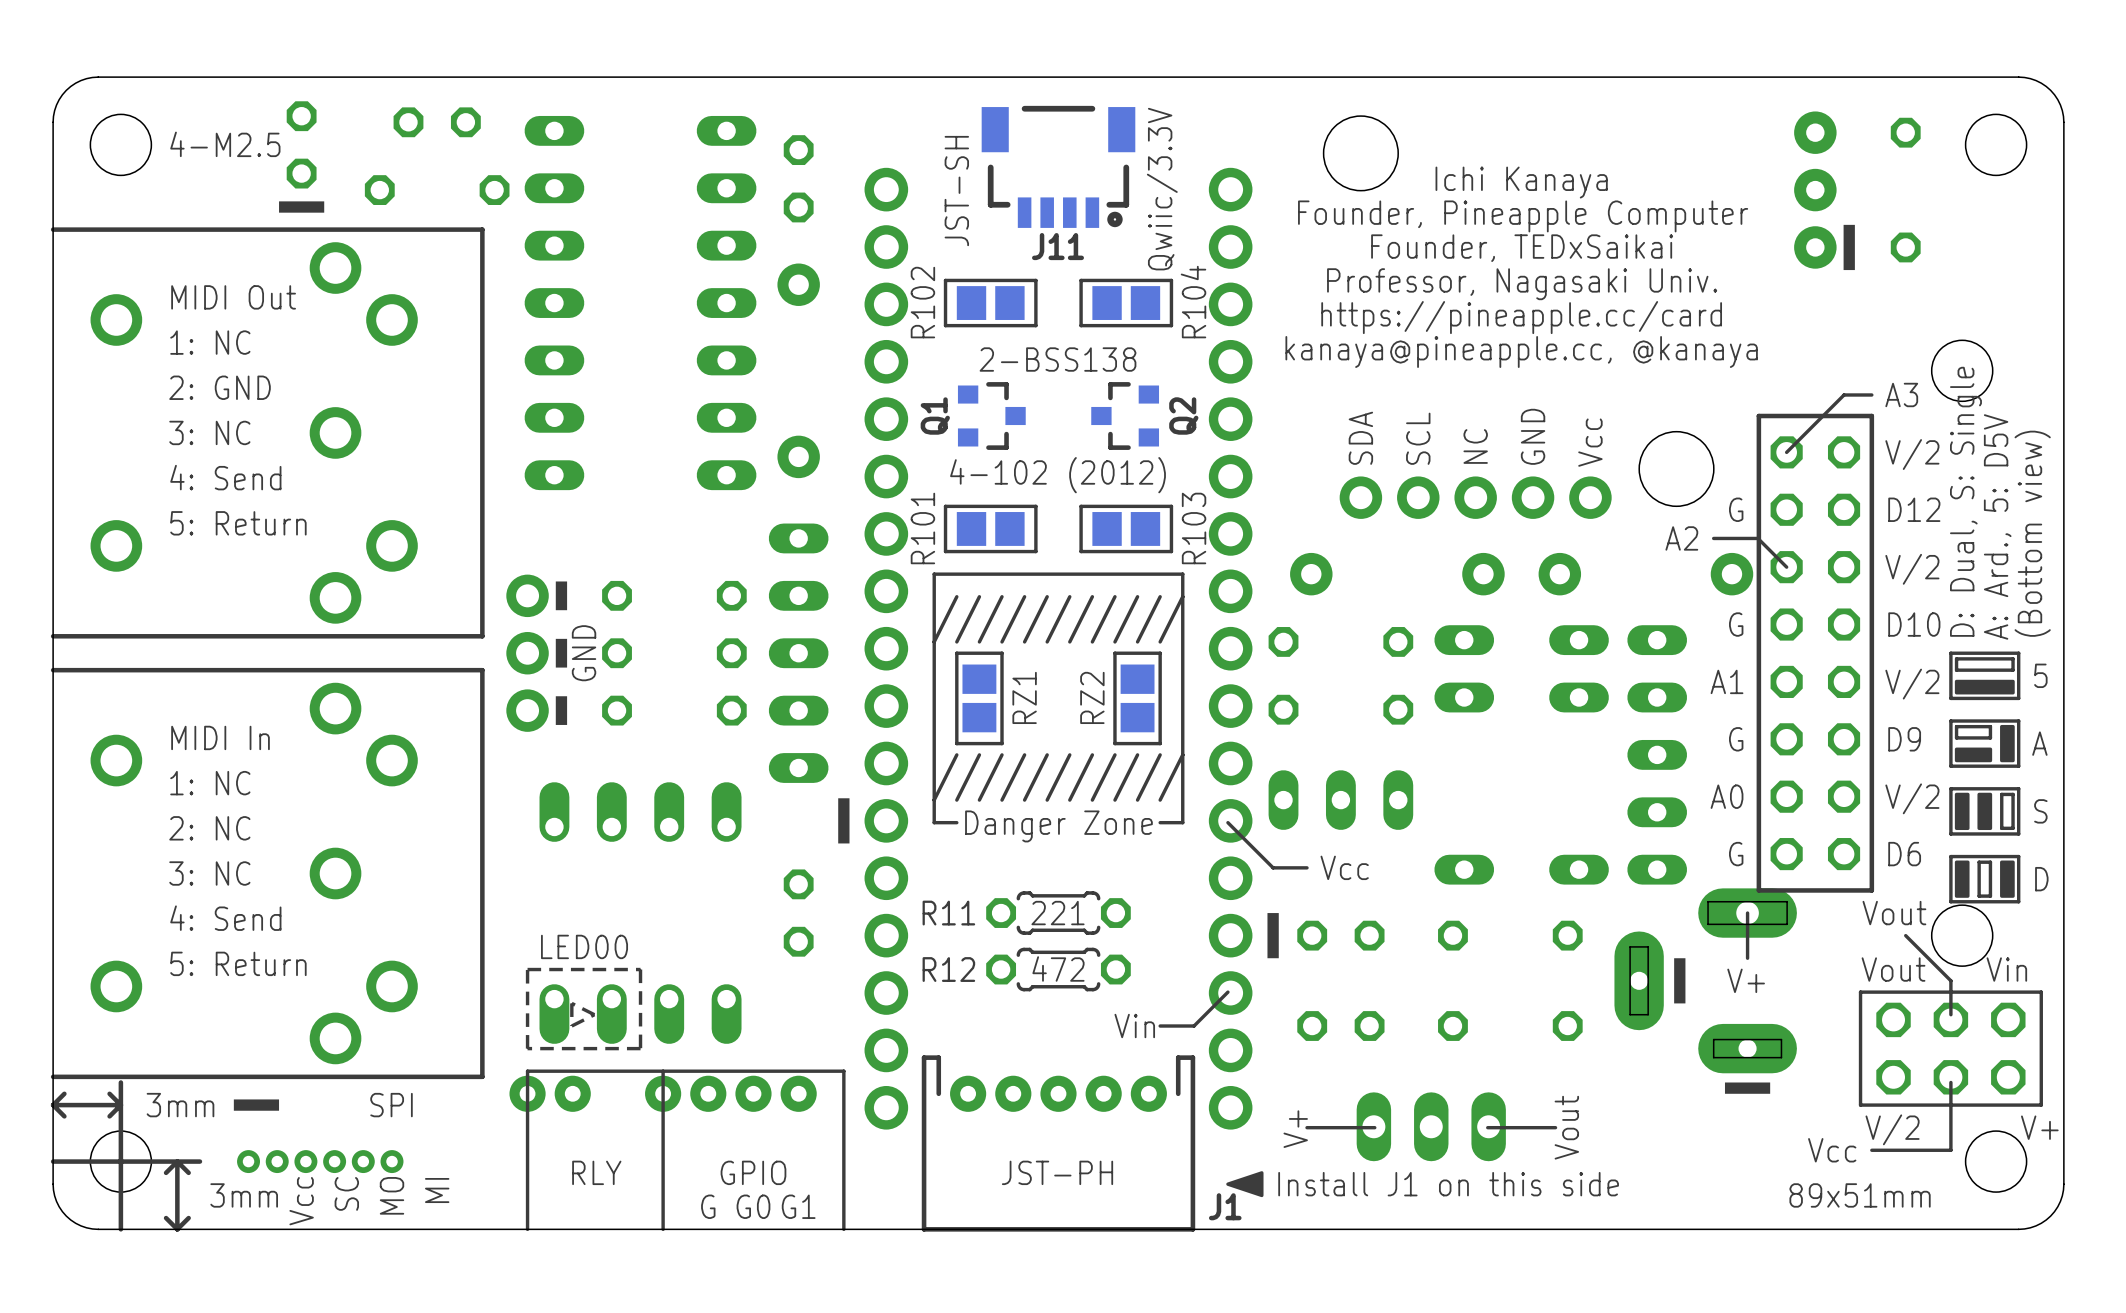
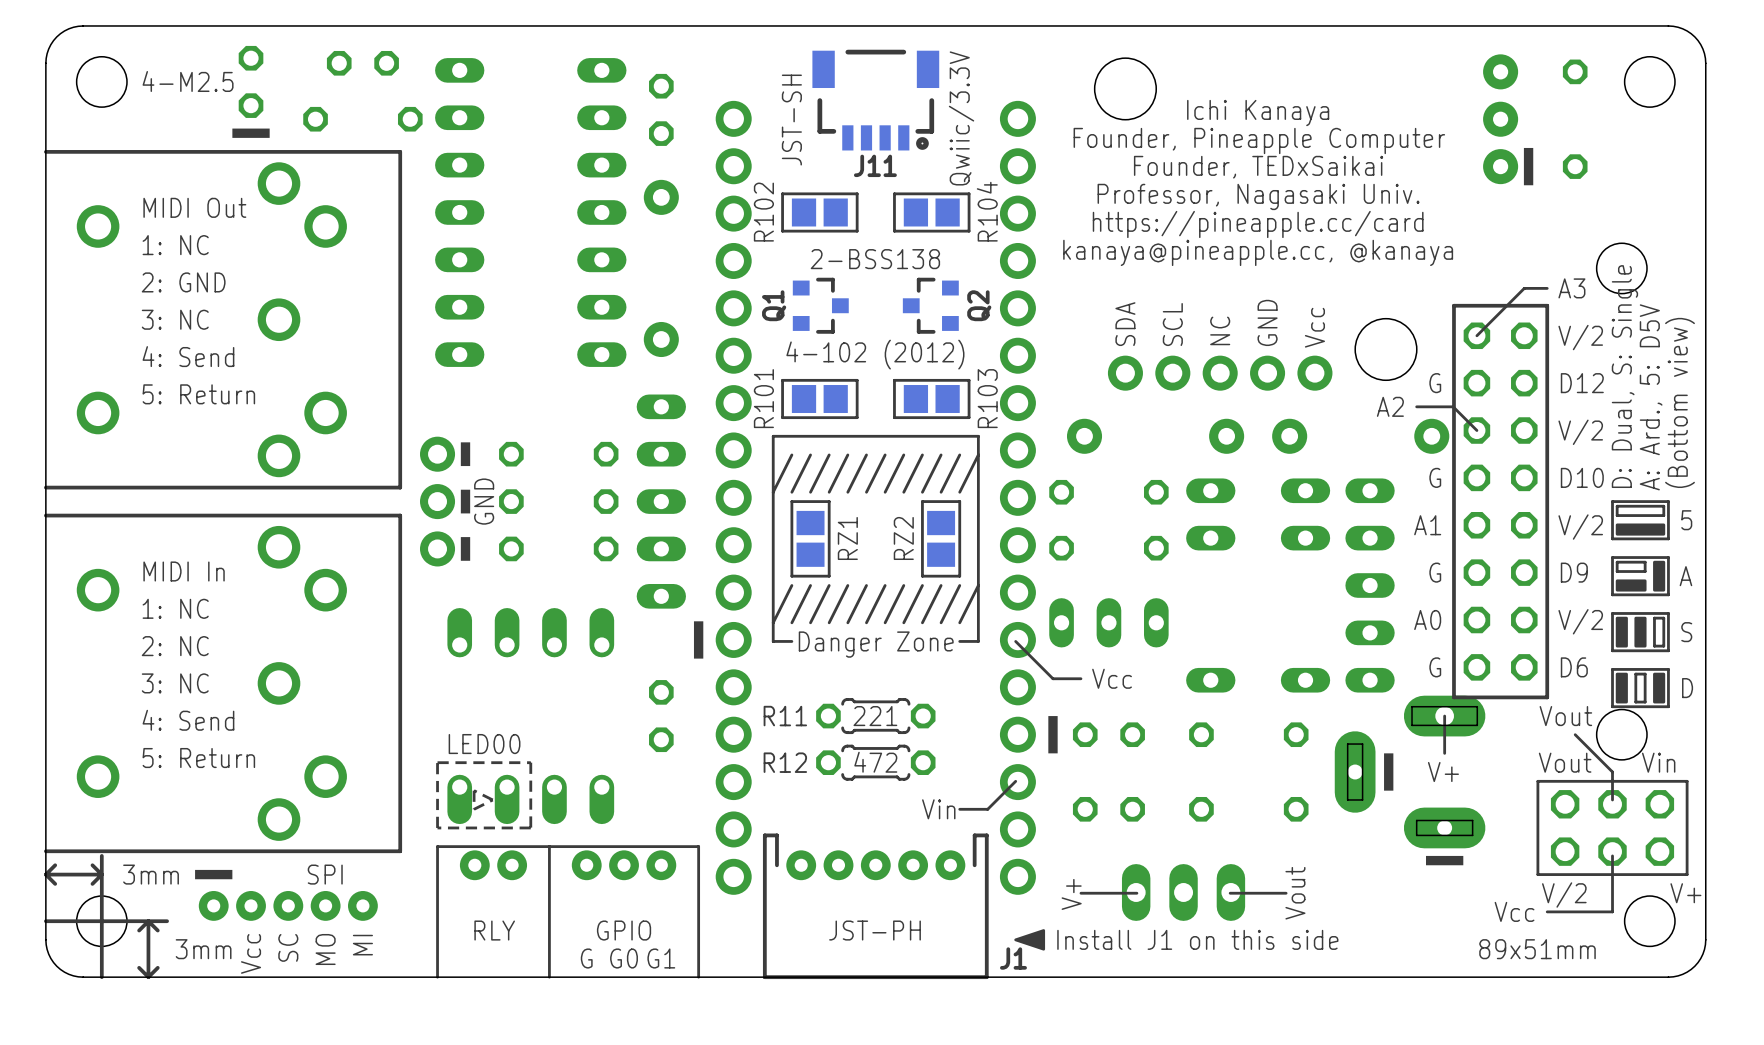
part footprint: [645, 1075, 817, 1112] -> [571, 850, 677, 881]
part position: (550, 1093) -> (493, 865)
part: none -> (288, 905)
part: (320, 1161) -> none

